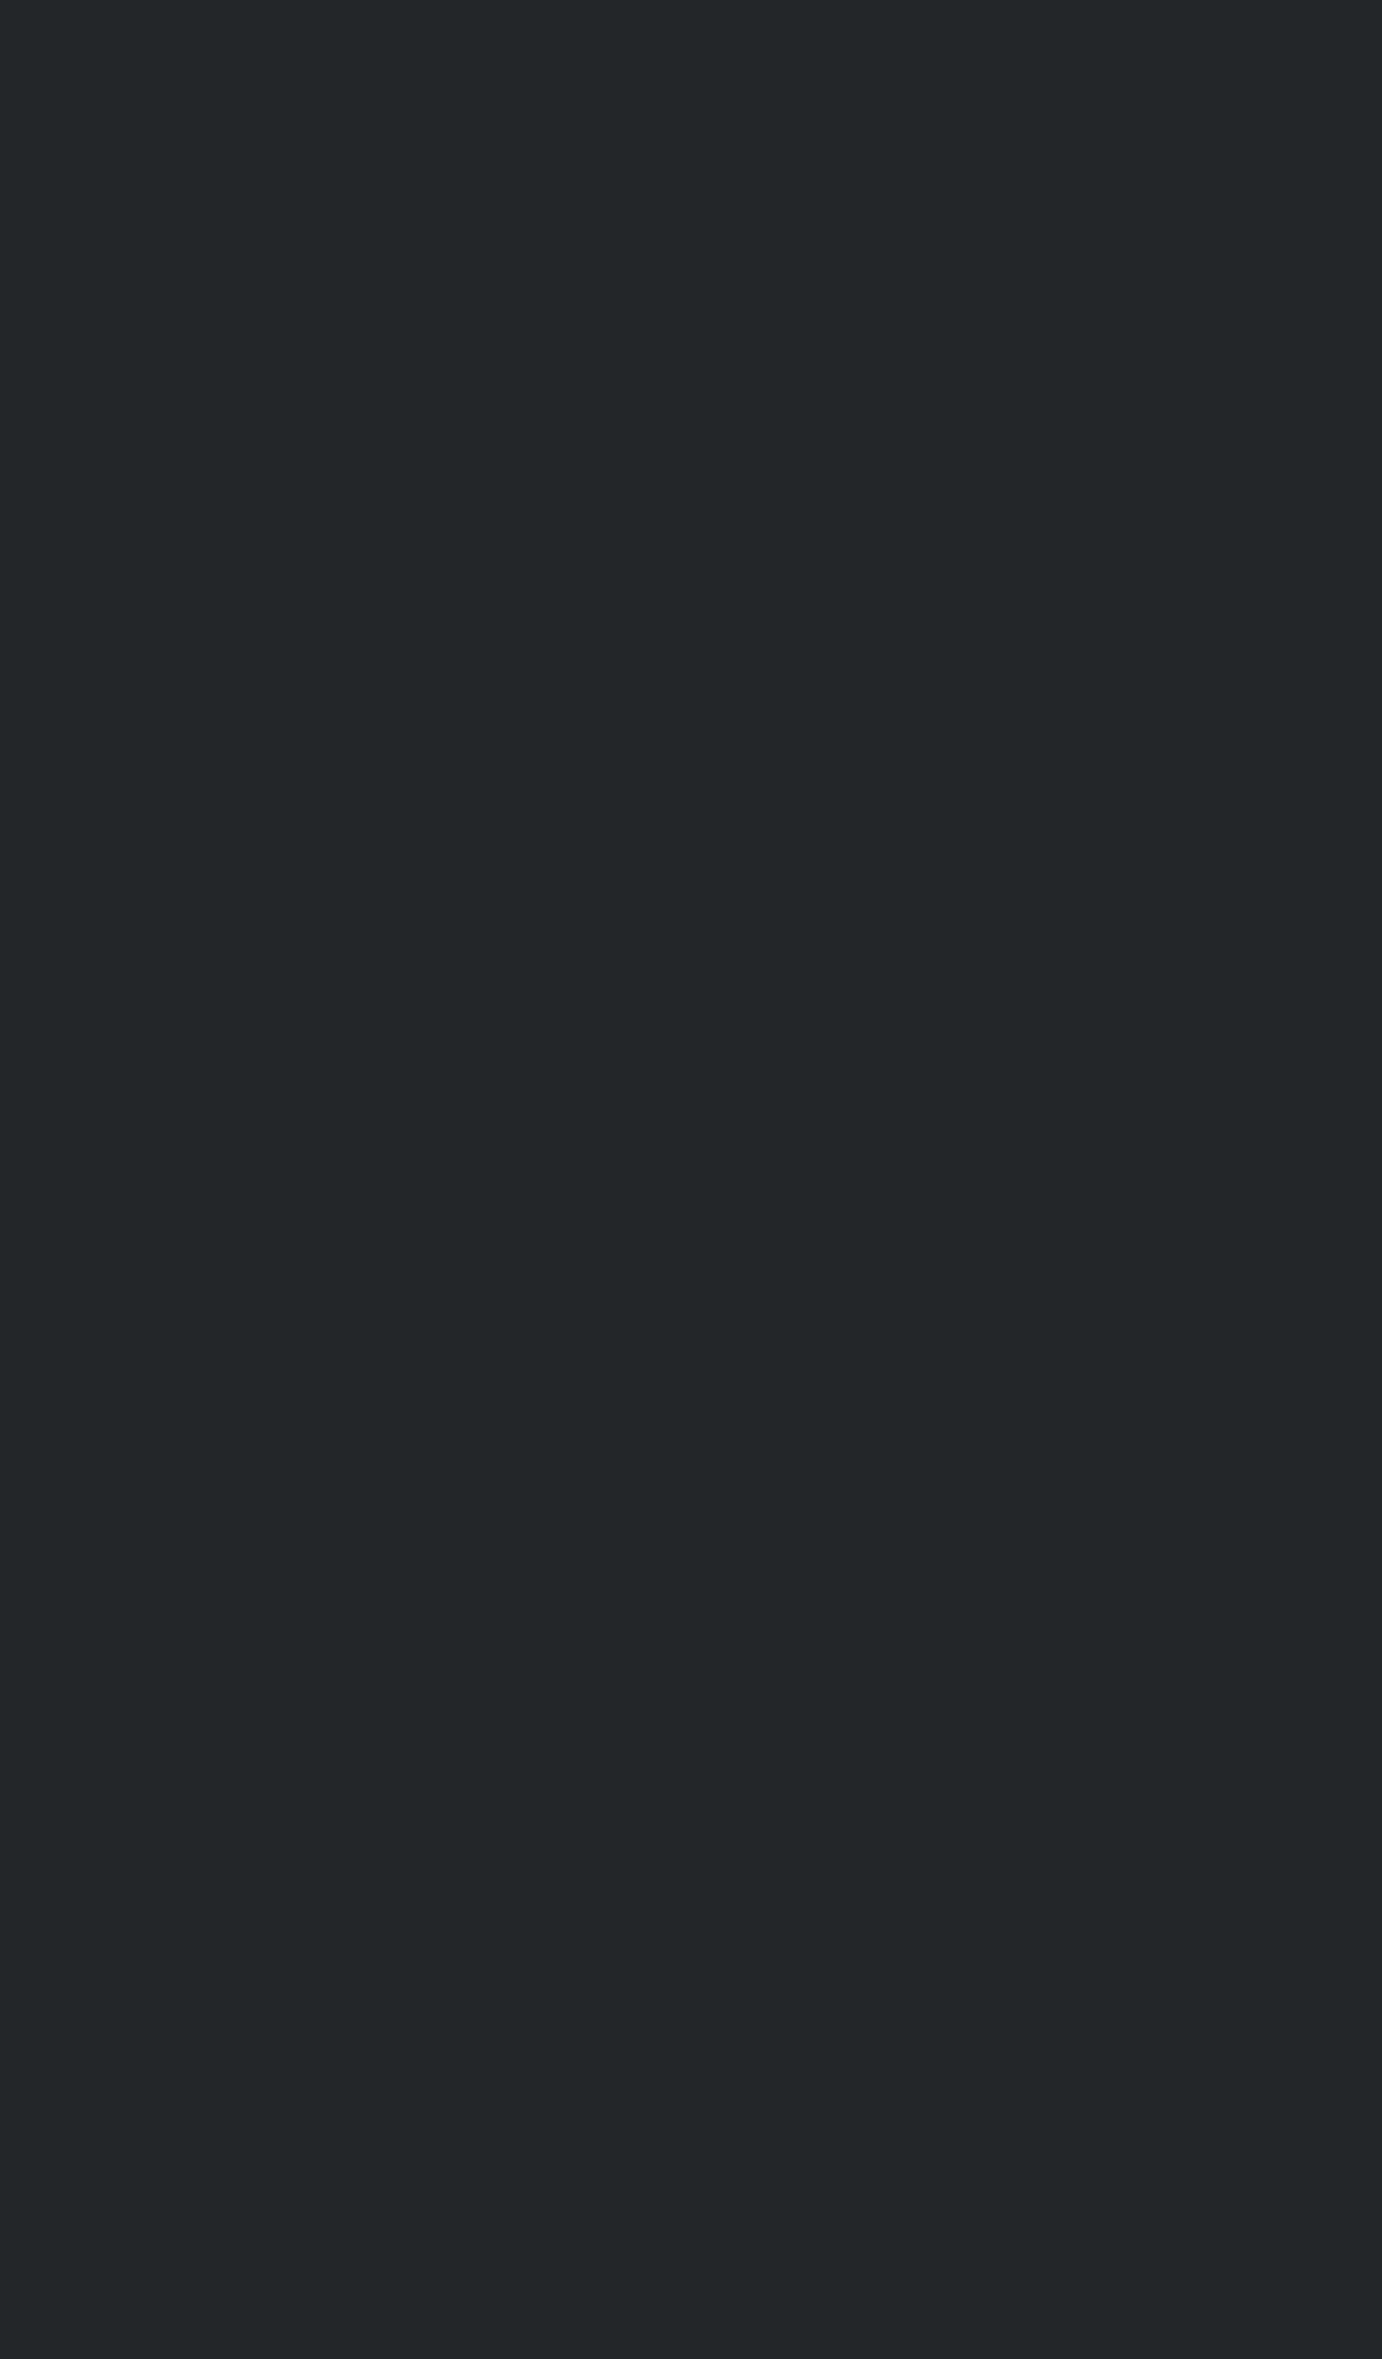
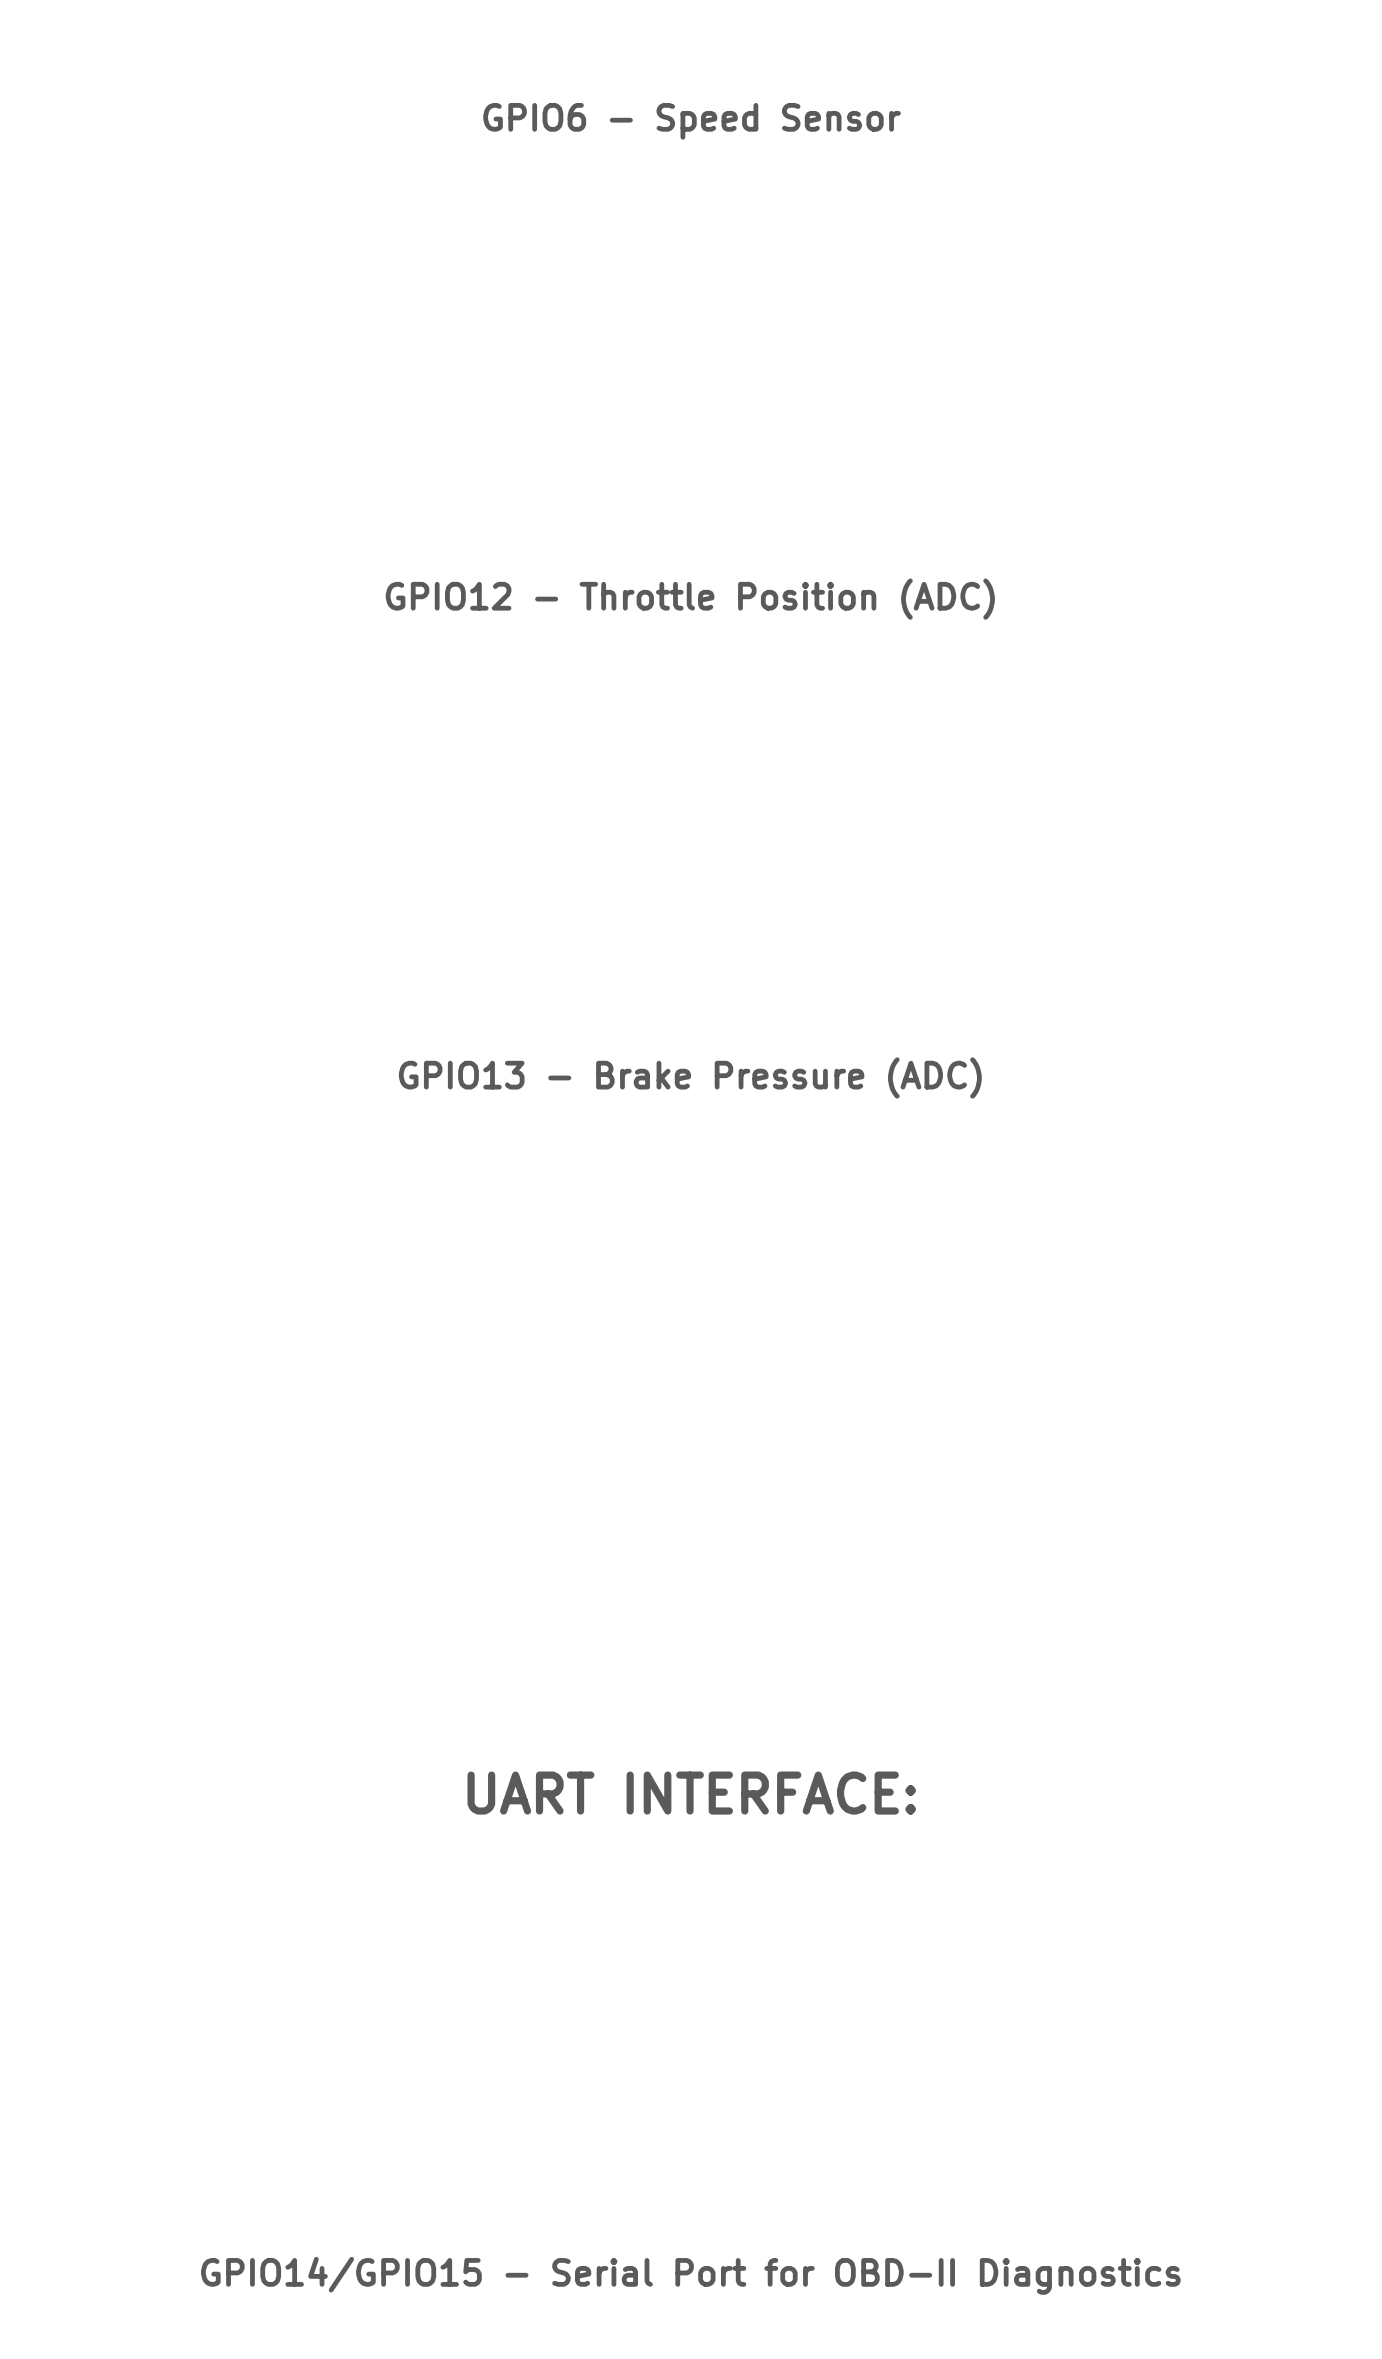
text: none -> GPIO6 - Speed Sensor (692, 121)
text: none -> GPIO12 - Throttle Position (ADC) (690, 599)
text: none -> GPIO13 - Brake Pressure (ADC) (690, 1077)
text: none -> UART INTERFACE: (691, 1793)
text: none -> GPIO14/GPIO15 - Serial Port for OBD-II Diagnostics (690, 2275)

